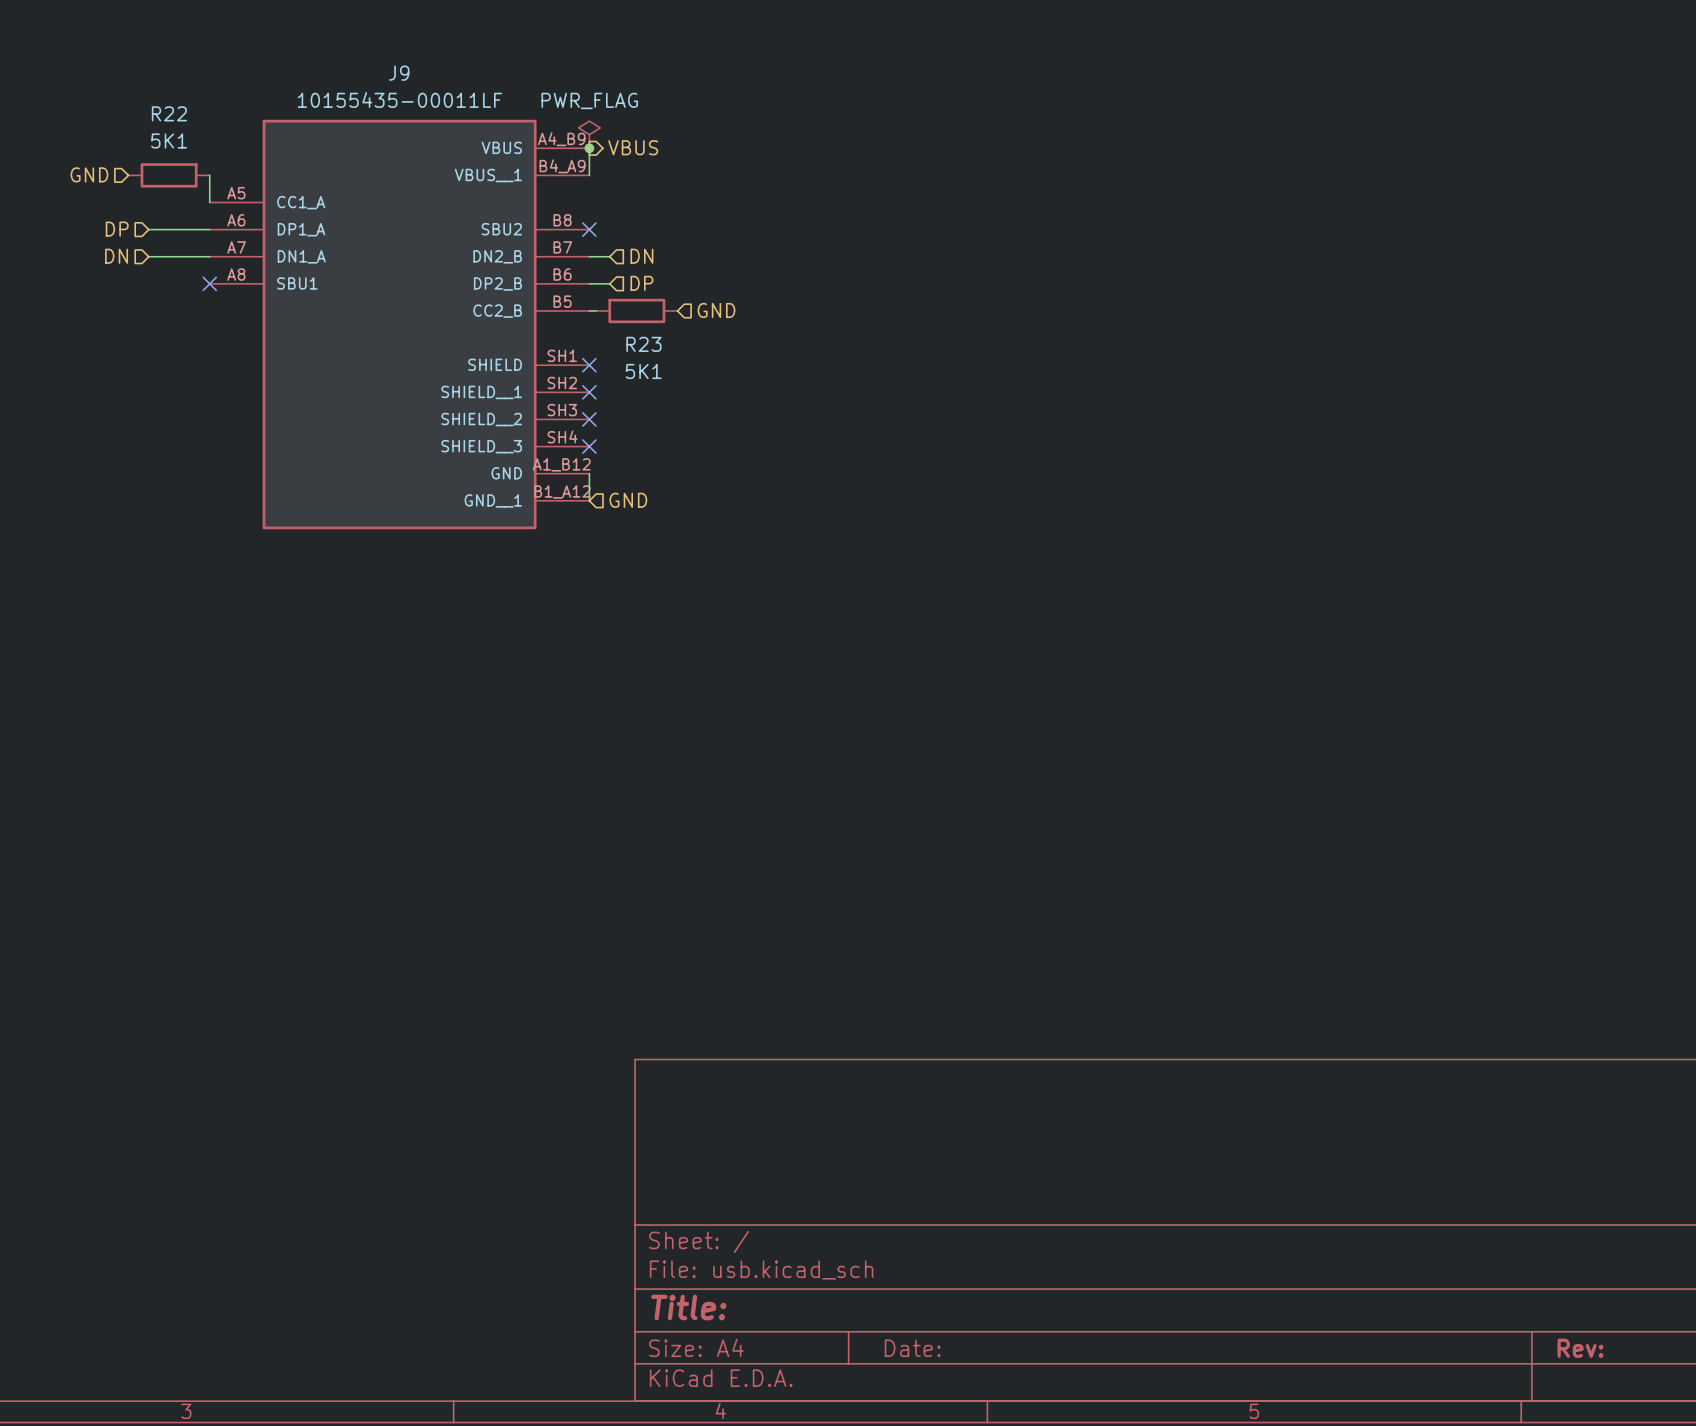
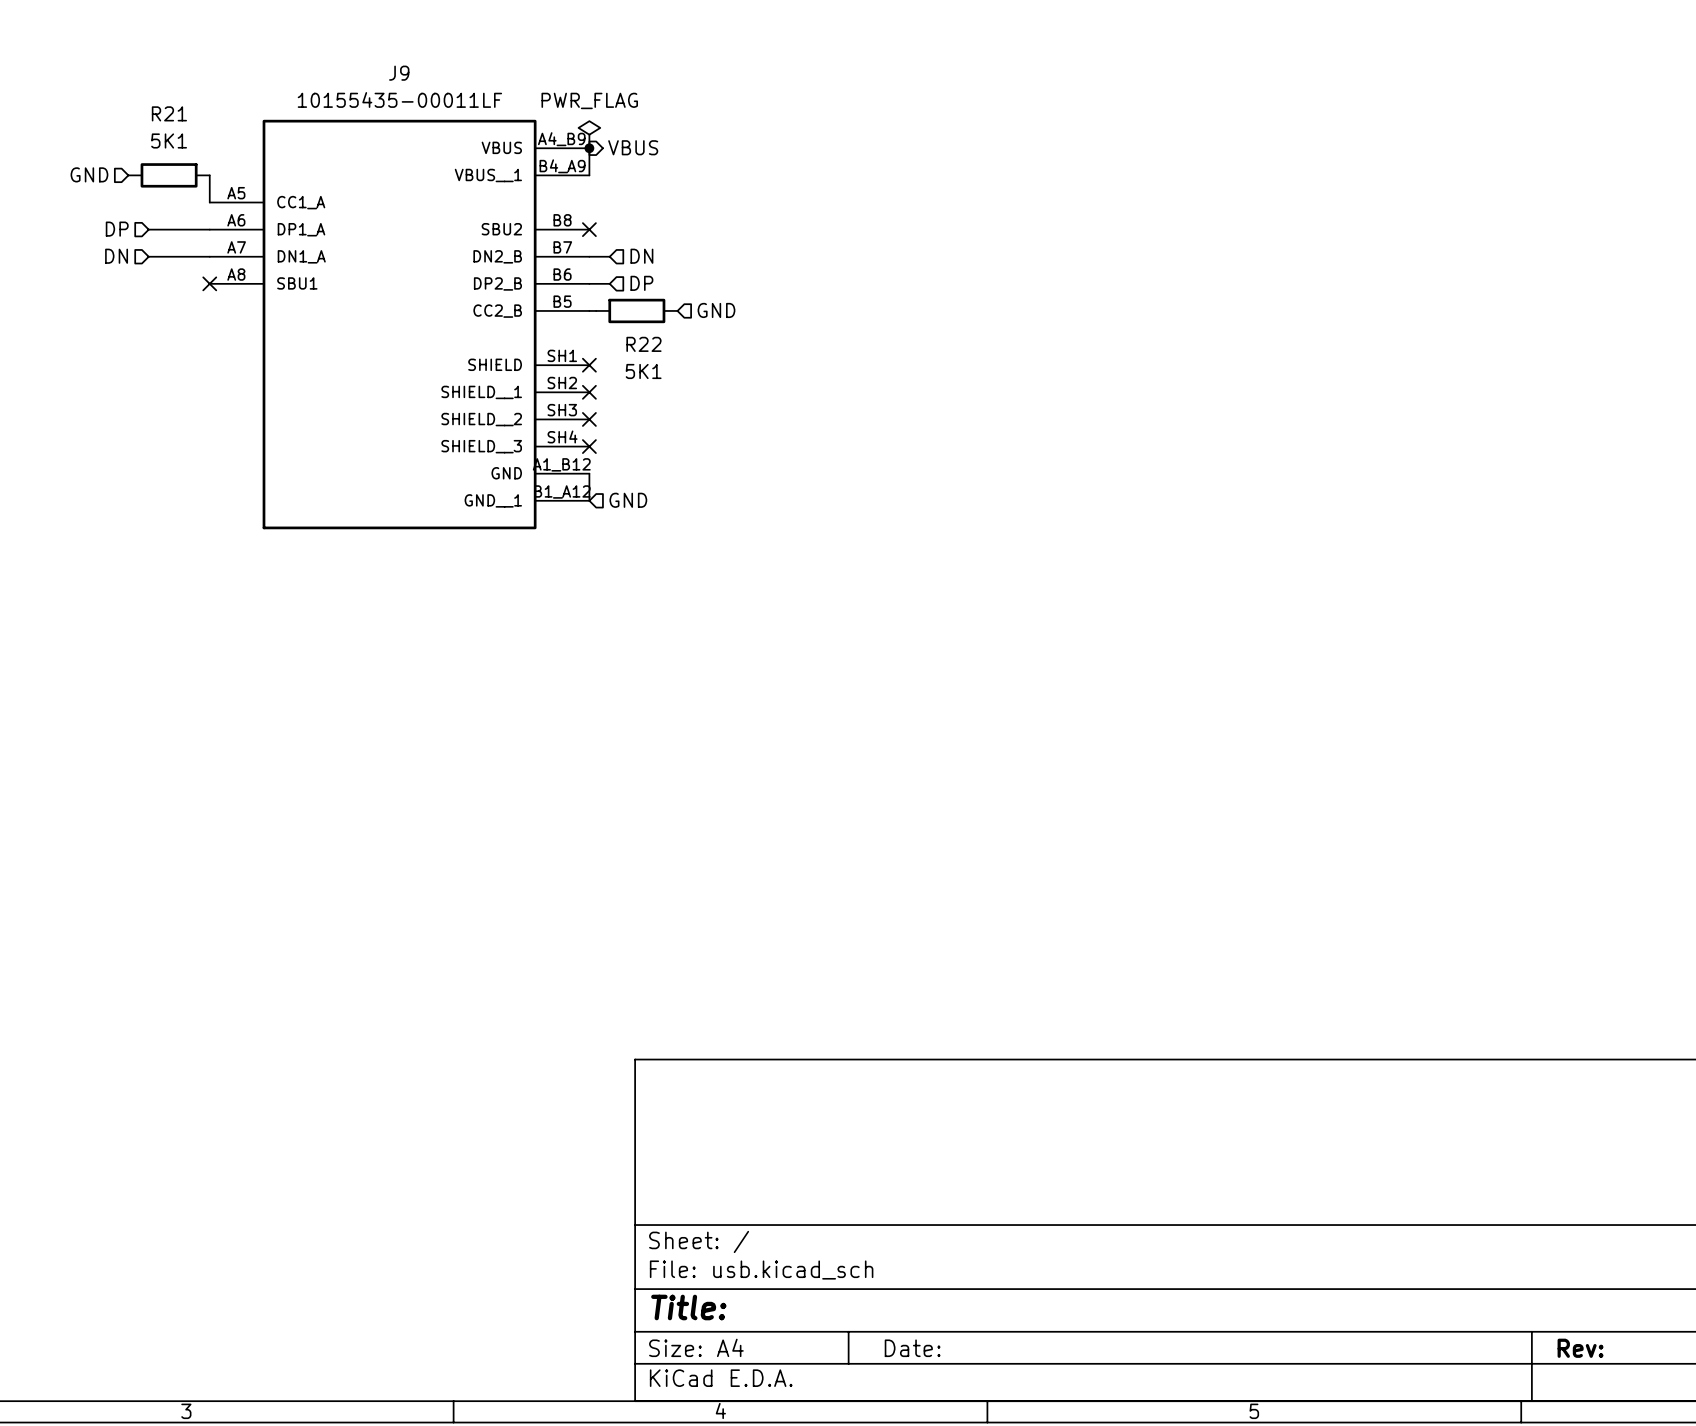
R22 name: R22 (169, 113) -> R21 (169, 113)
R23 name: R23 (643, 344) -> R22 (643, 344)

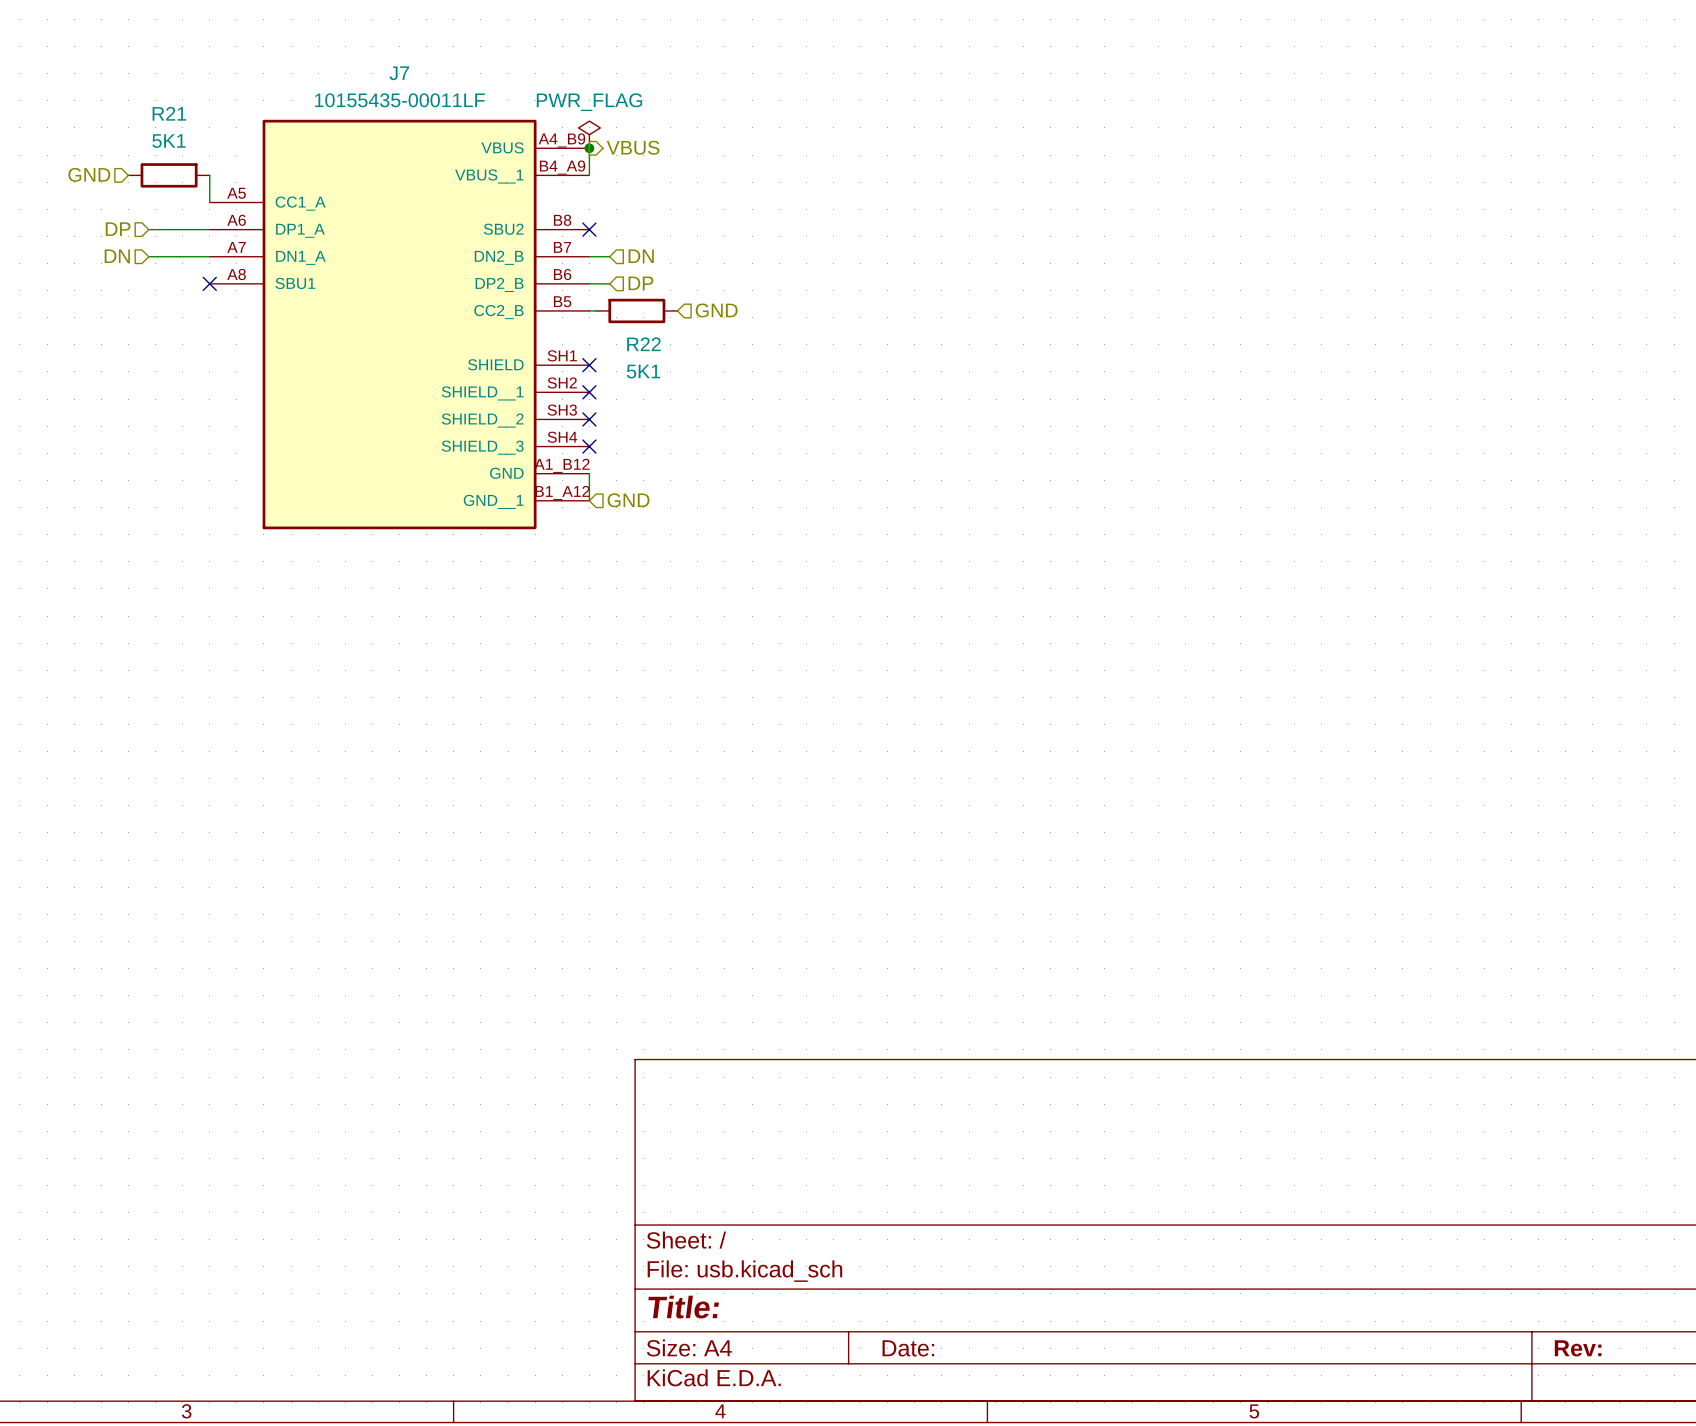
J9 name: J9 (399, 73) -> J7 (399, 73)

